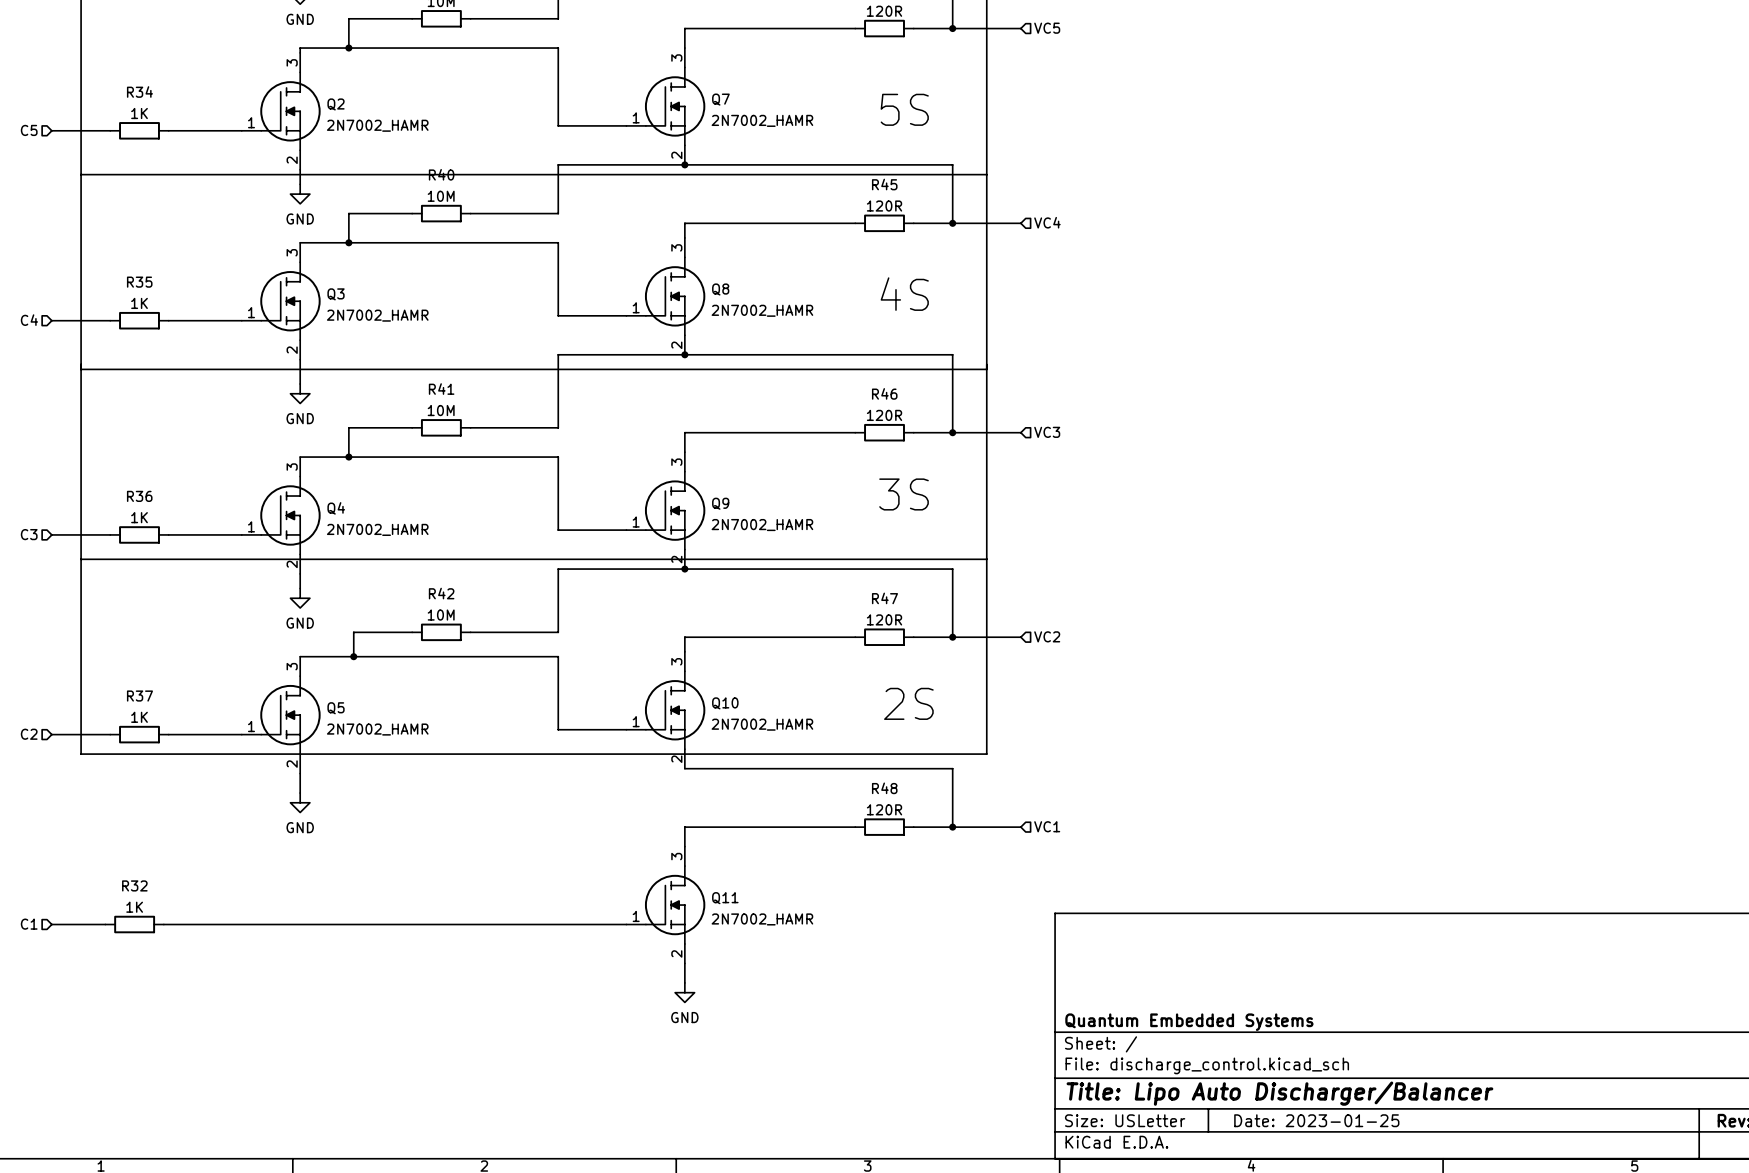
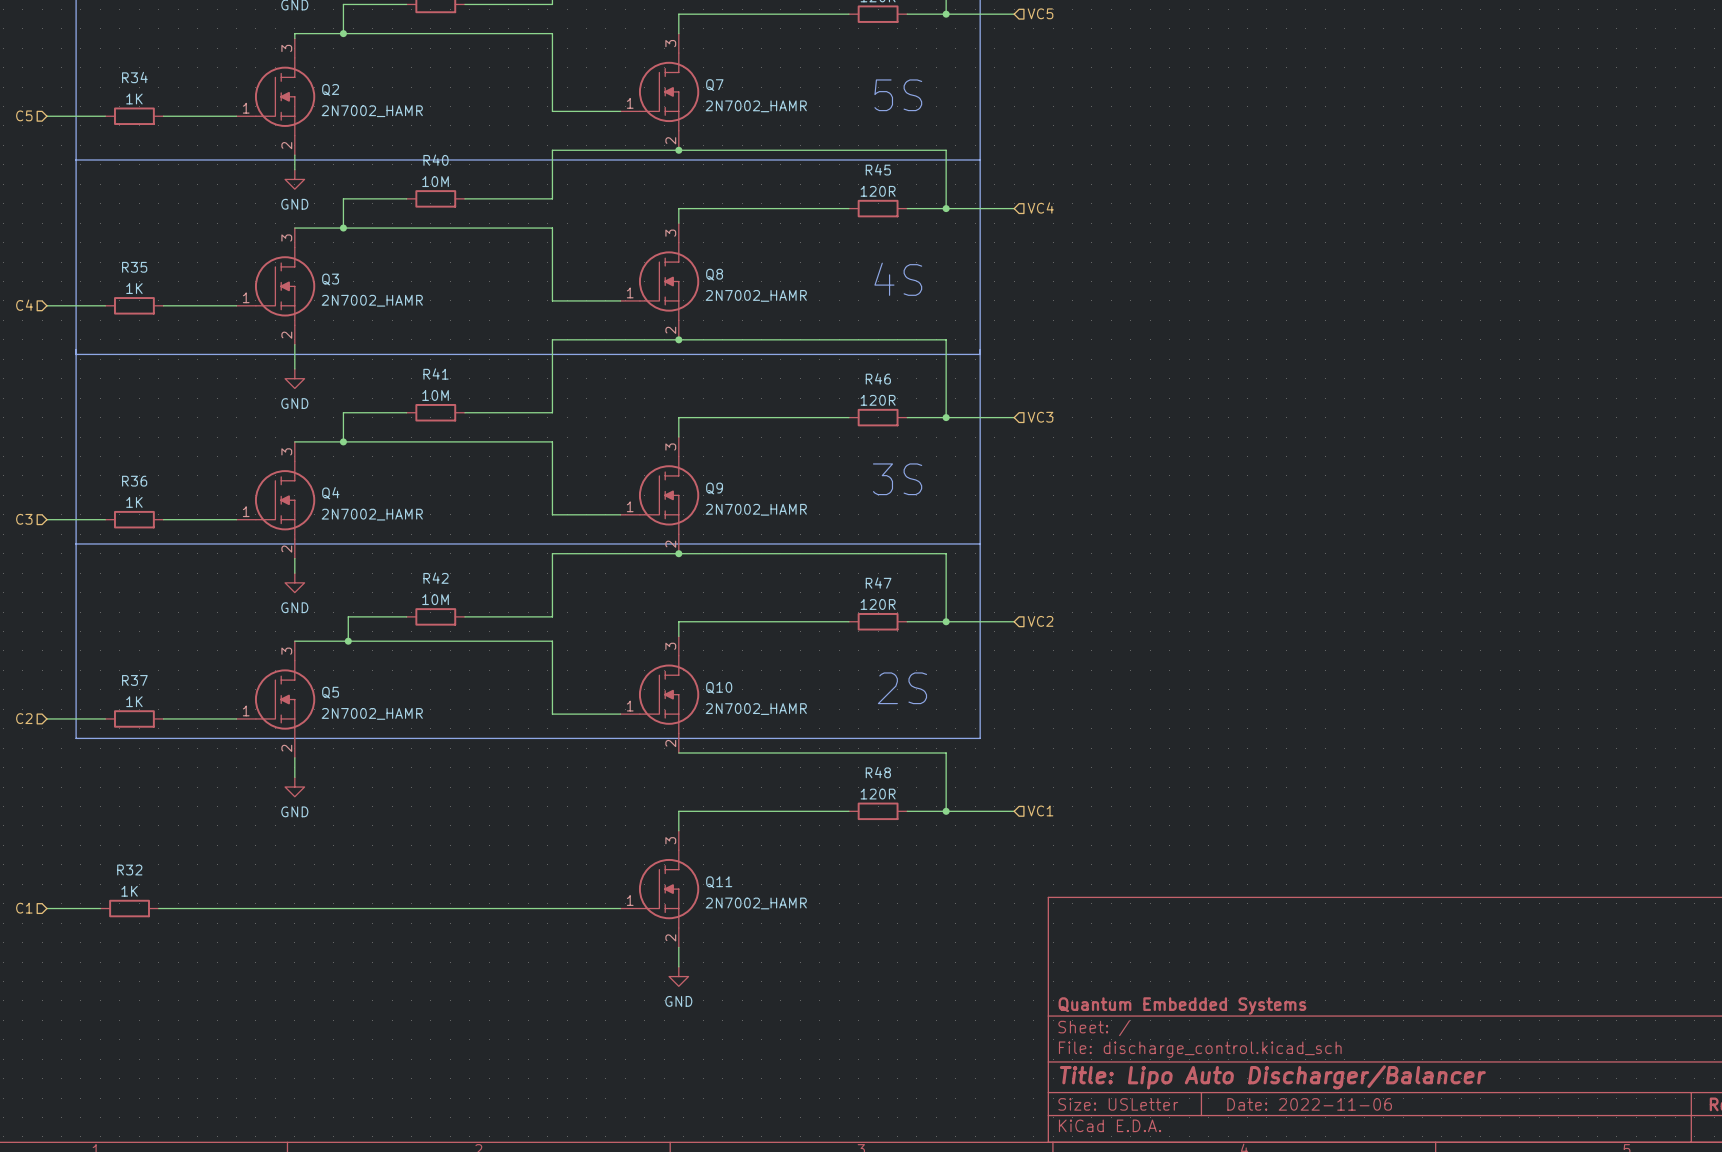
title block: Date: 2023-01-25 (1316, 1120) -> Date: 2022-11-06 (1309, 1104)

